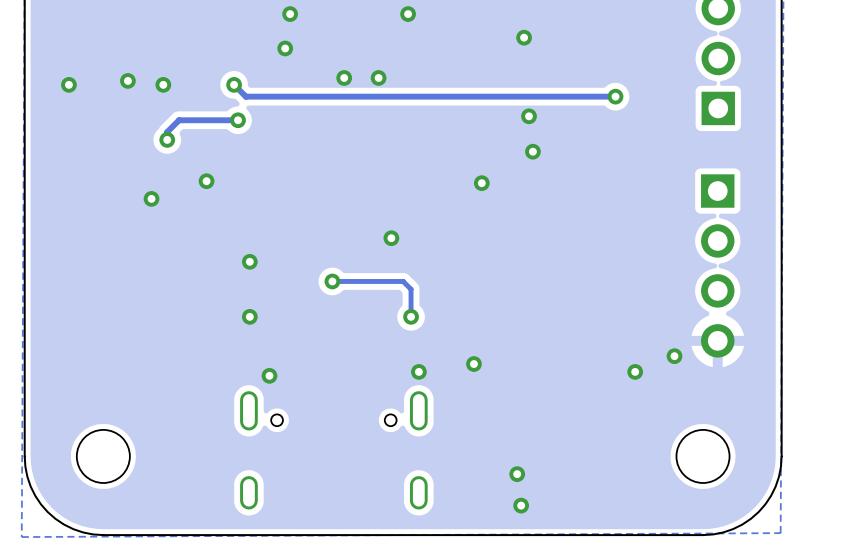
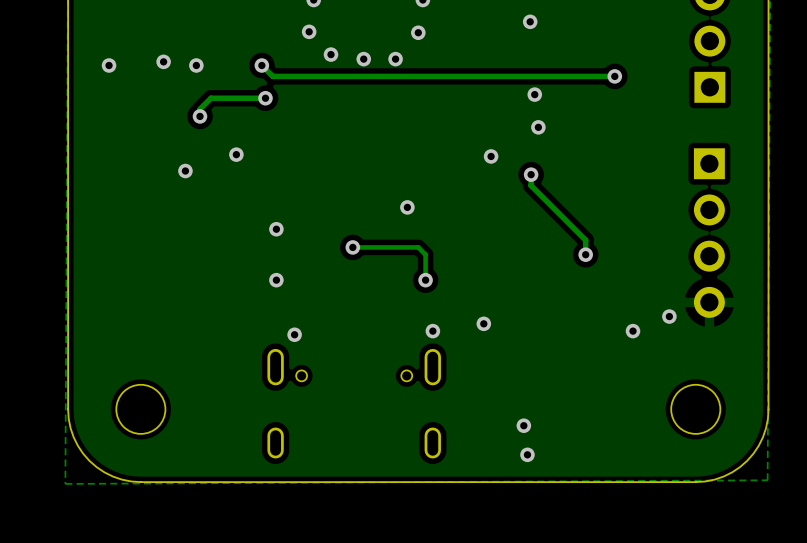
via: none -> (418, 32)
via: none -> (330, 54)
track: none -> (531, 174) (531, 185) (585, 240) (585, 254)
via: none -> (531, 174)
via: none -> (585, 254)

